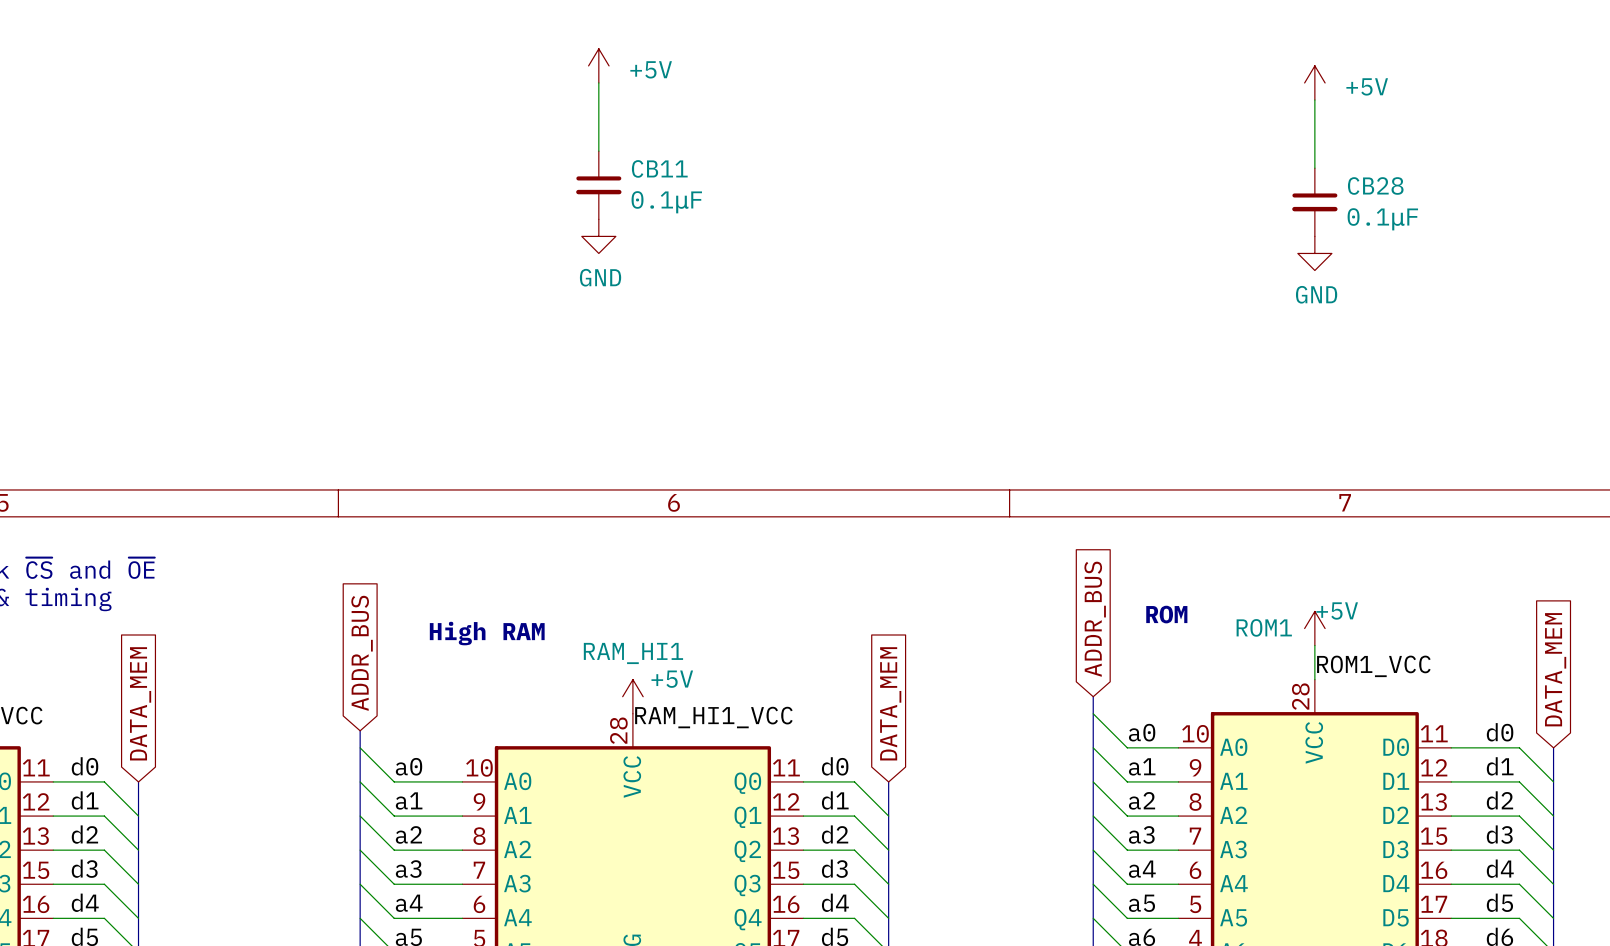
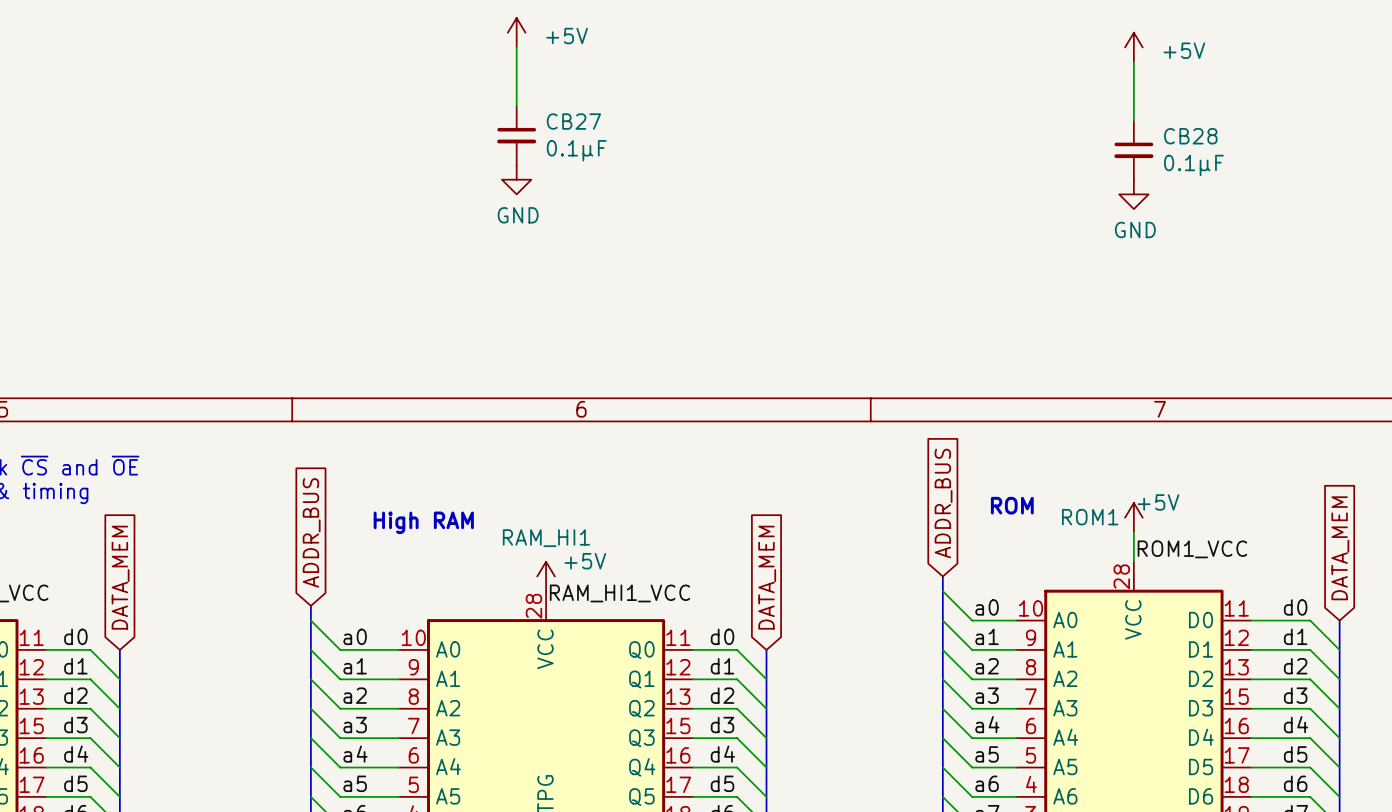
CB11 name: CB11 (659, 168) -> CB27 (573, 121)

